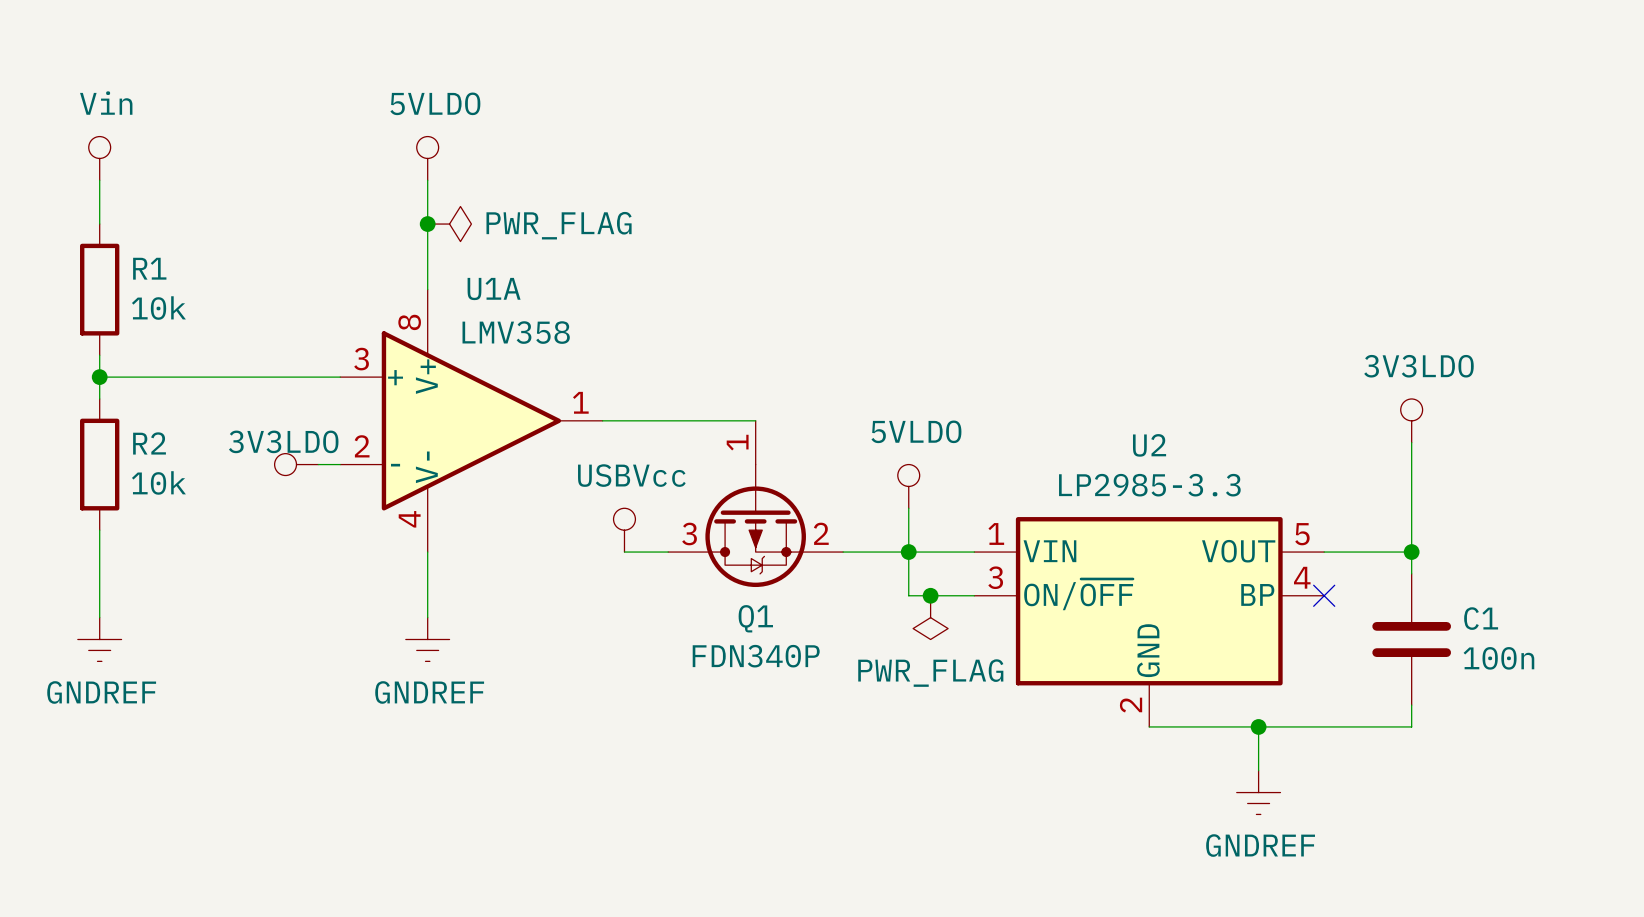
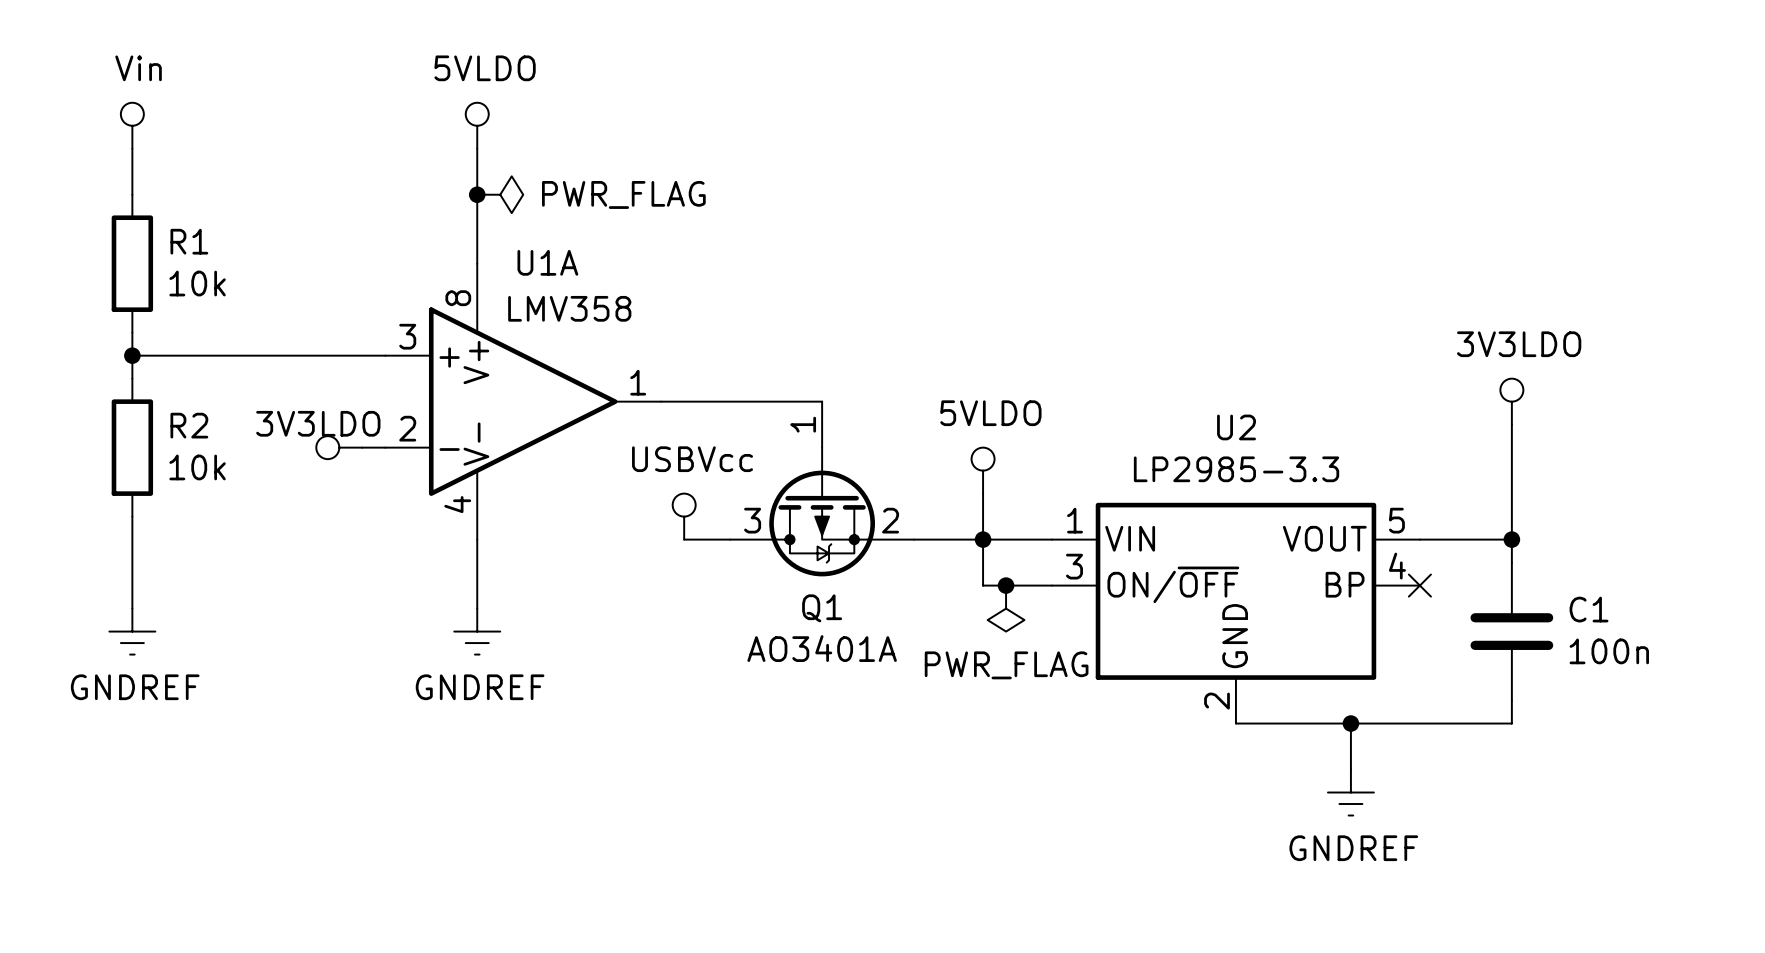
Q1 value: FDN340P (756, 656) -> AO3401A (822, 648)

